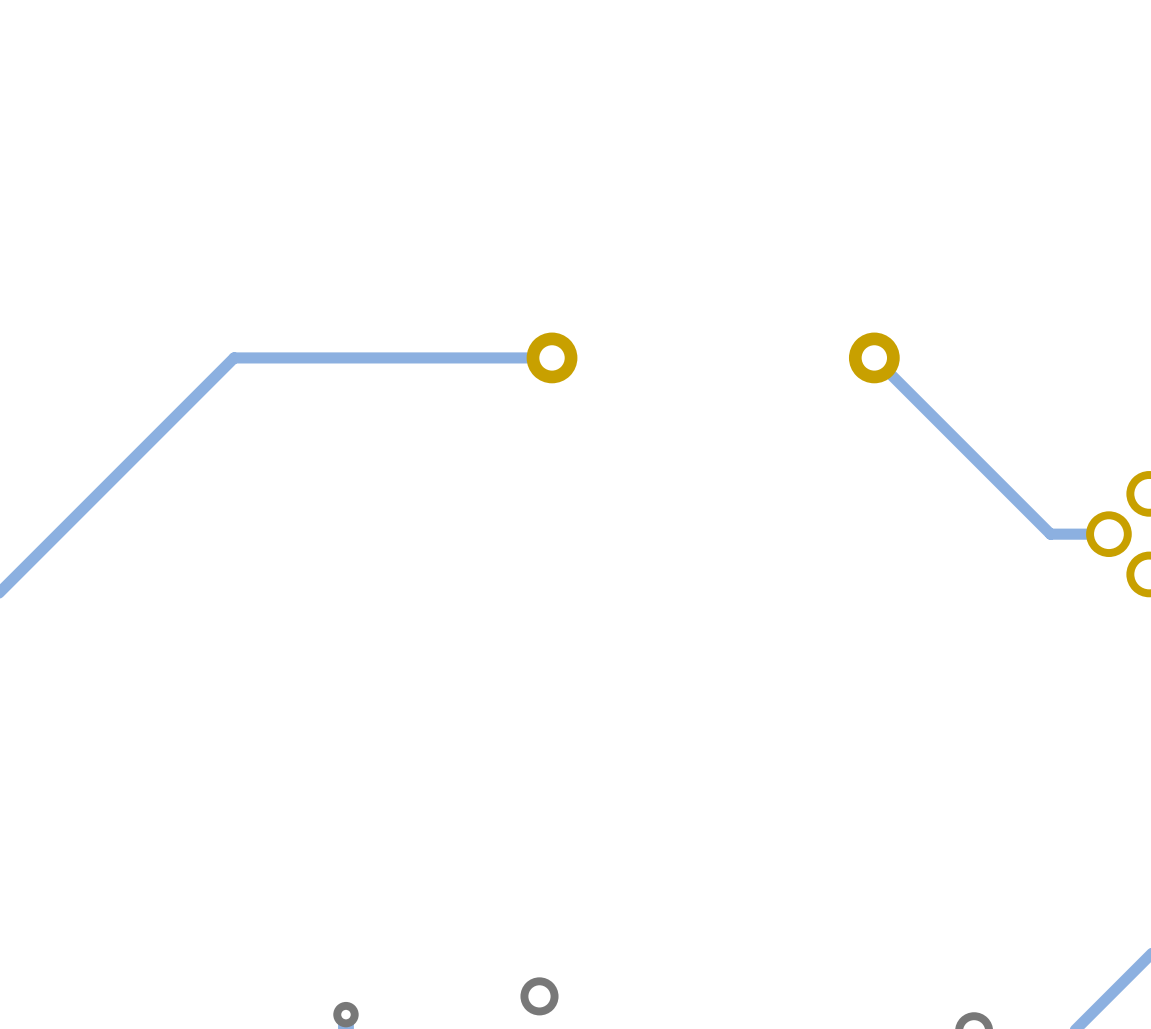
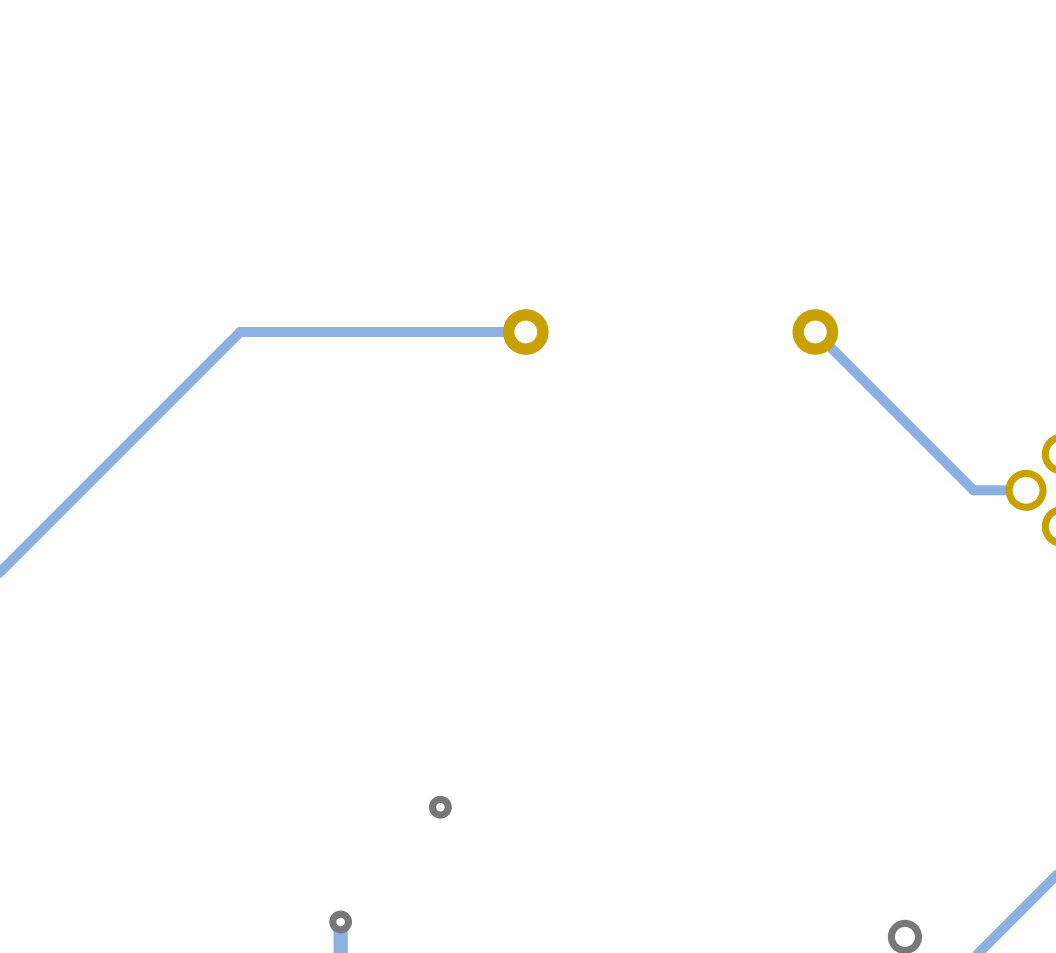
via: none -> (440, 807)
via: (539, 996) -> none

